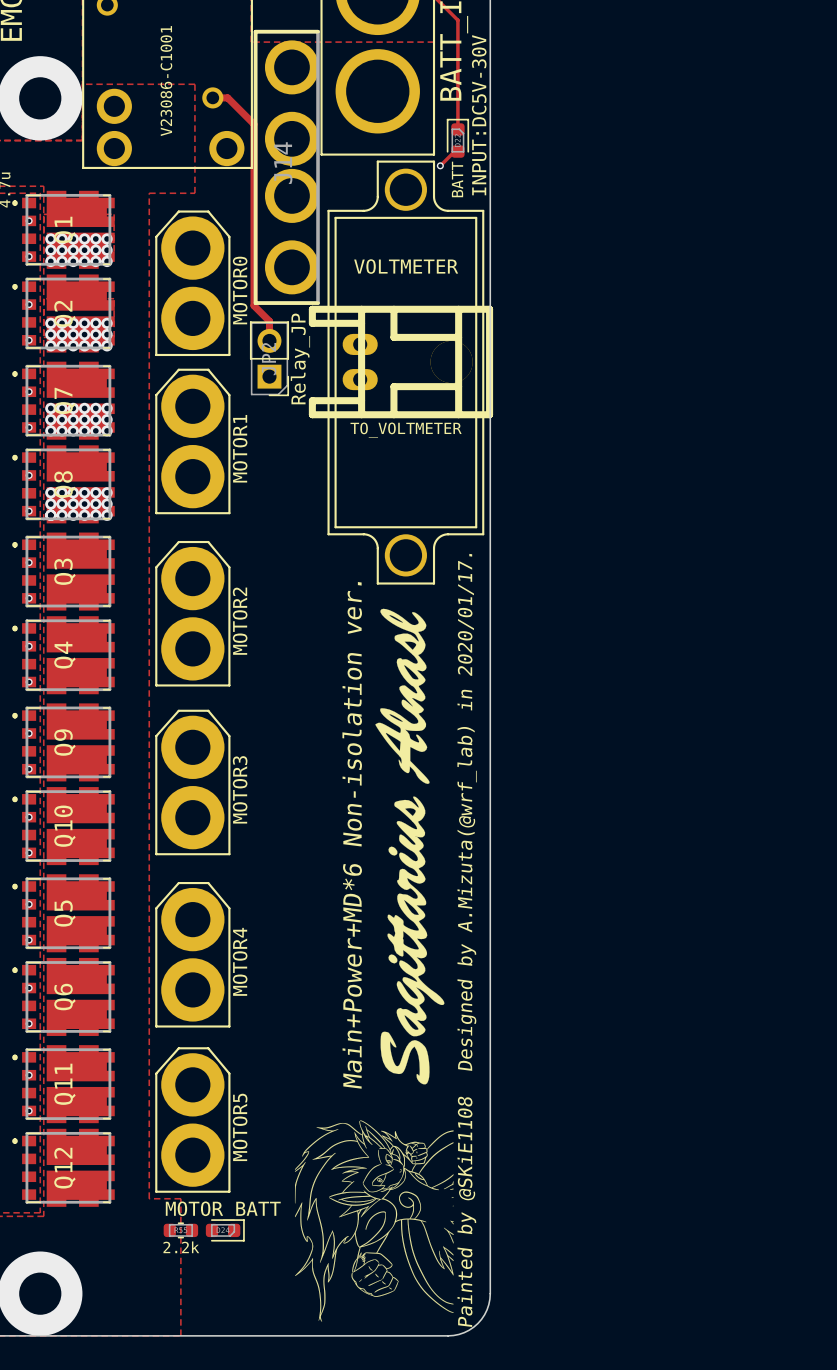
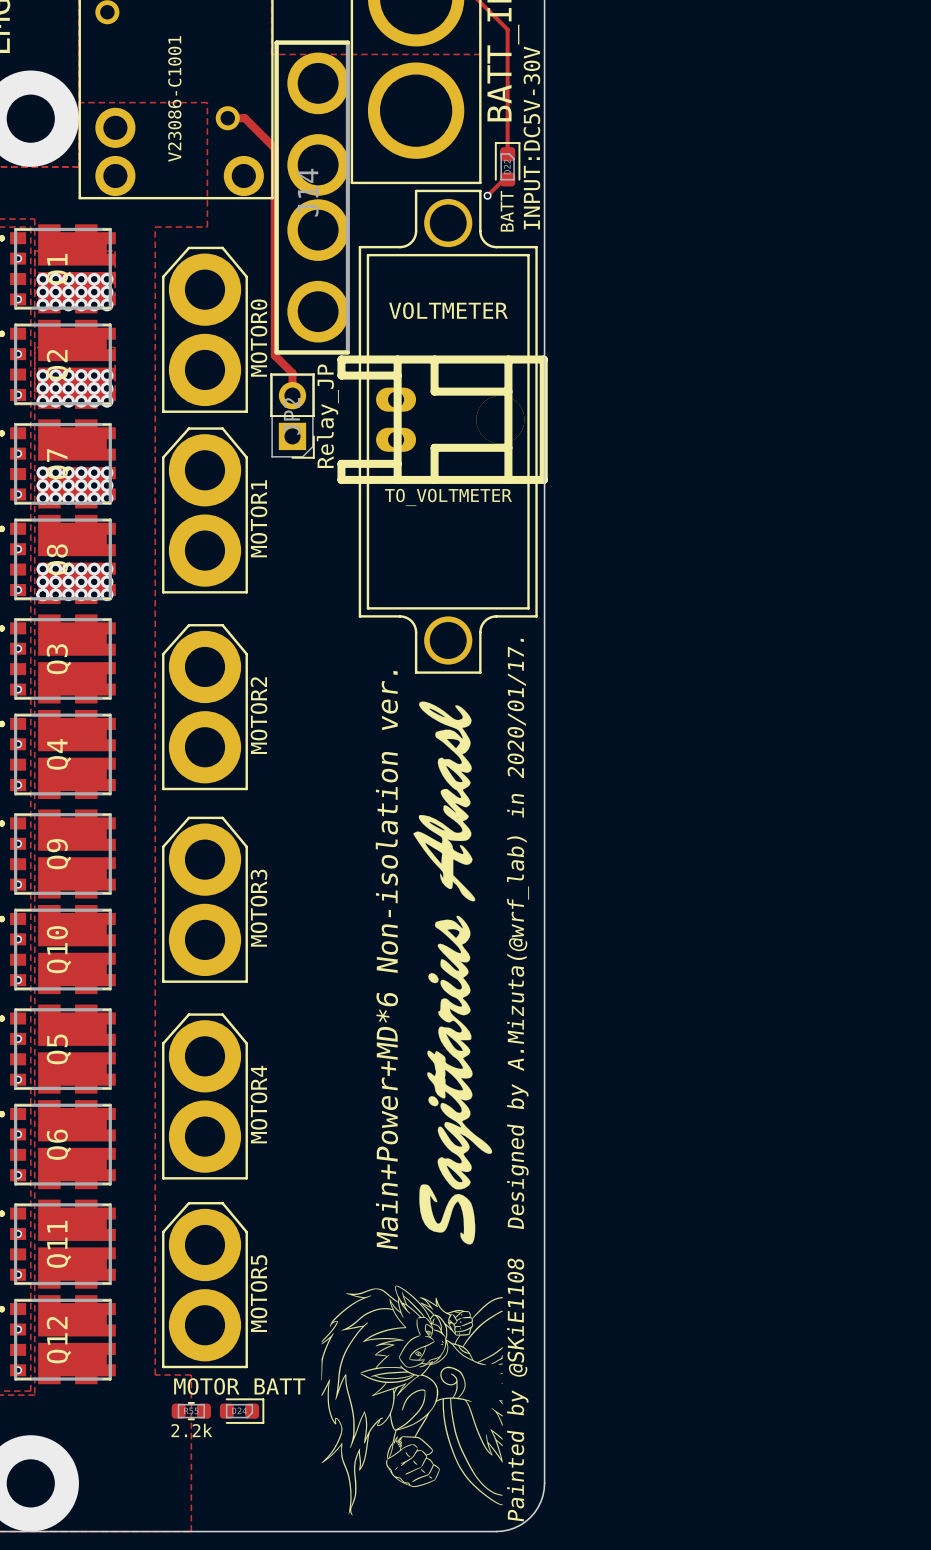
via: none -> (18, 1329)
via: none -> (18, 1370)

